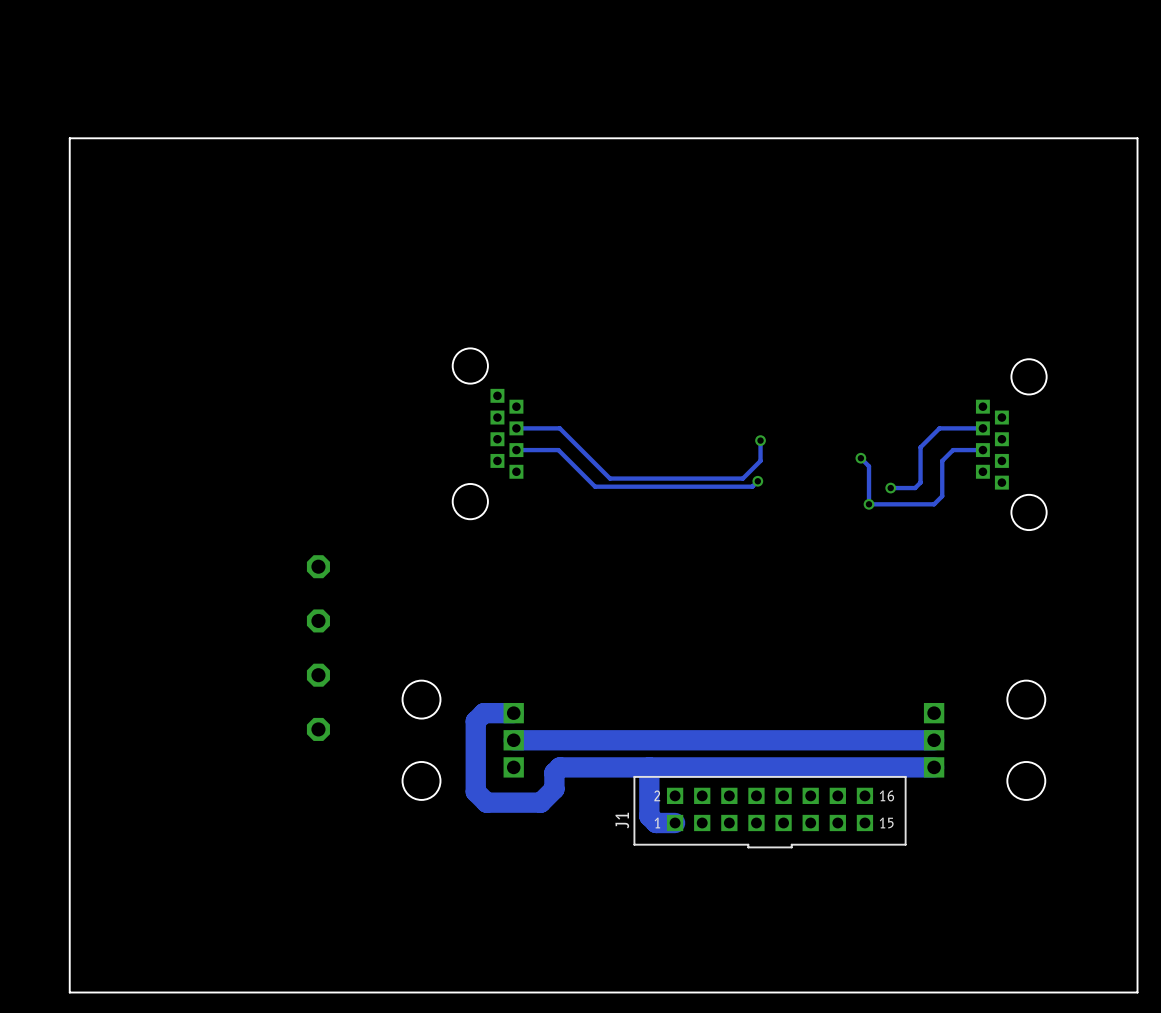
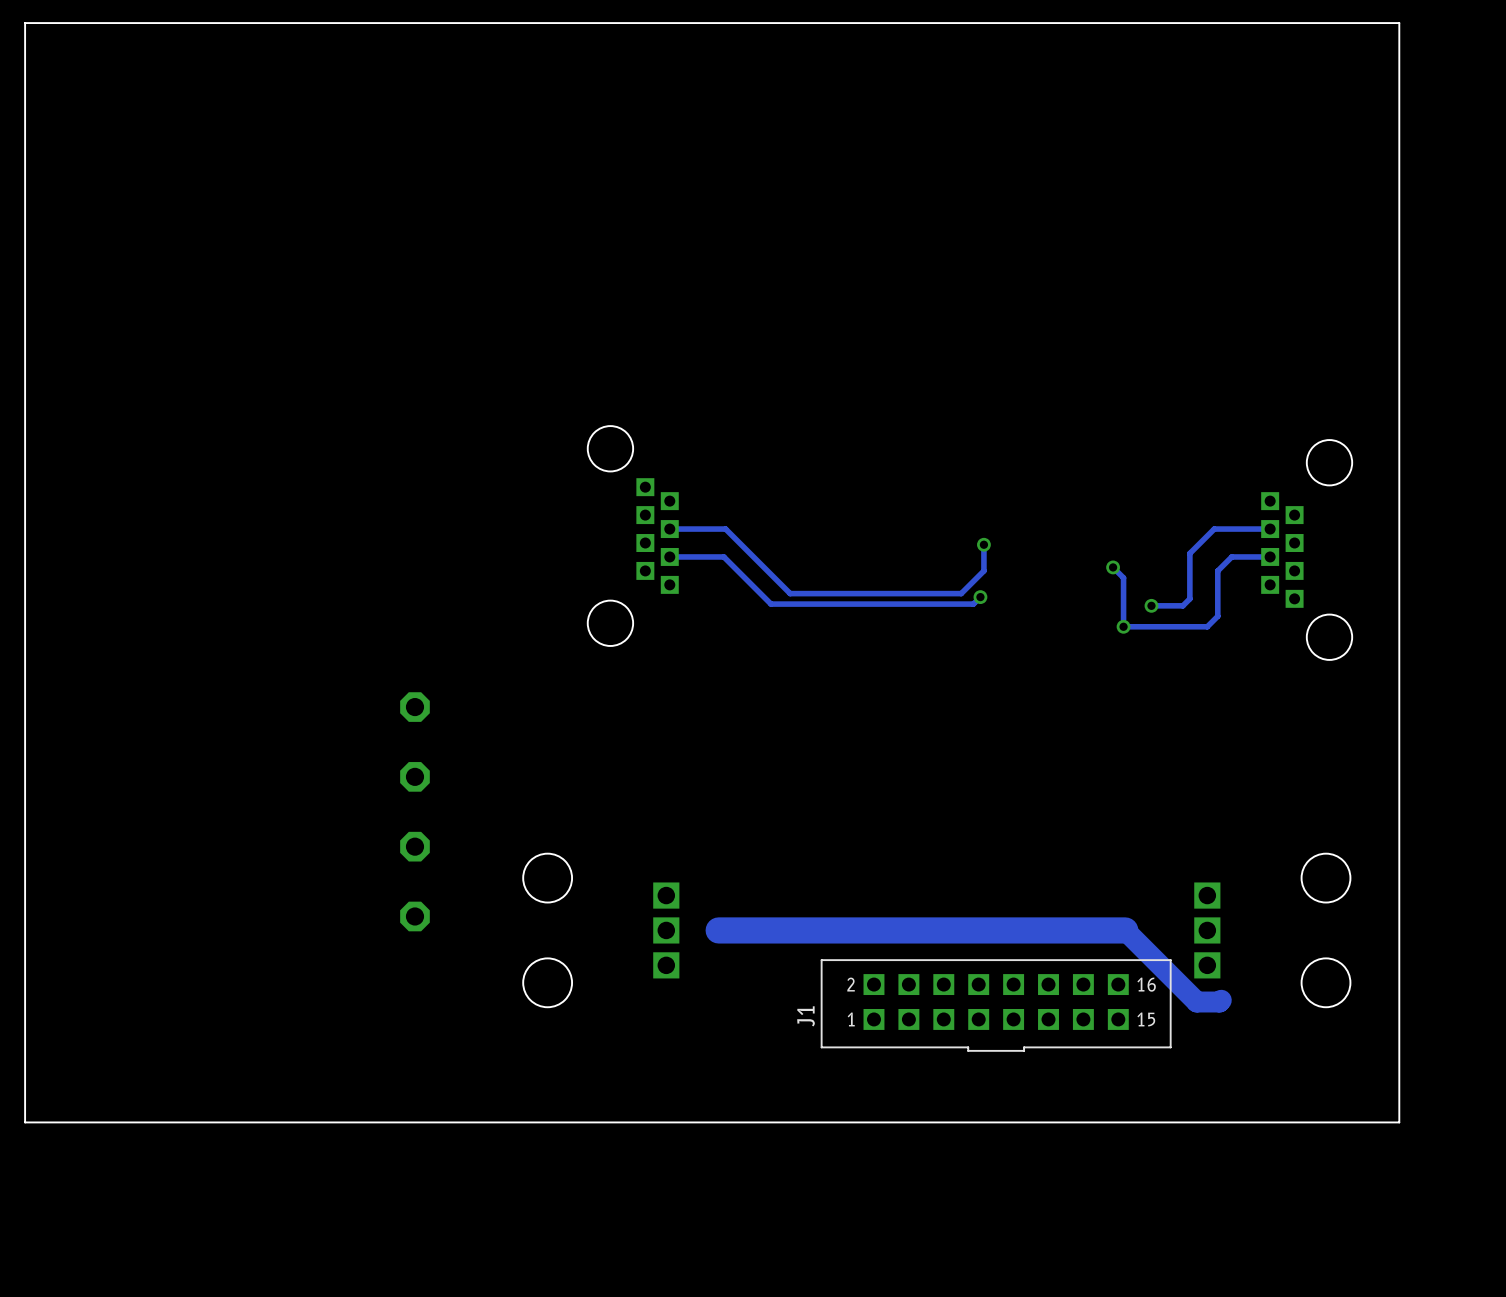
board edge: (1137, 138) (69, 138) (69, 992) (1137, 992) (1137, 138) -> (1399, 23) (25, 23) (25, 1122) (1399, 1122) (1399, 23)
track: (513, 713) (483, 713) (475, 721) (475, 791) (486, 802) (540, 802) (554, 789) (554, 772) (559, 767) (934, 767) -> none
track: (554, 740) (513, 740) -> none
track: (934, 740) (870, 740) -> (1221, 1000) (1219, 1002) (1196, 1002) (1125, 930)
track: (649, 767) (649, 816) (656, 823) (675, 823) -> none
J1 position: (770, 812) -> (996, 1005)

